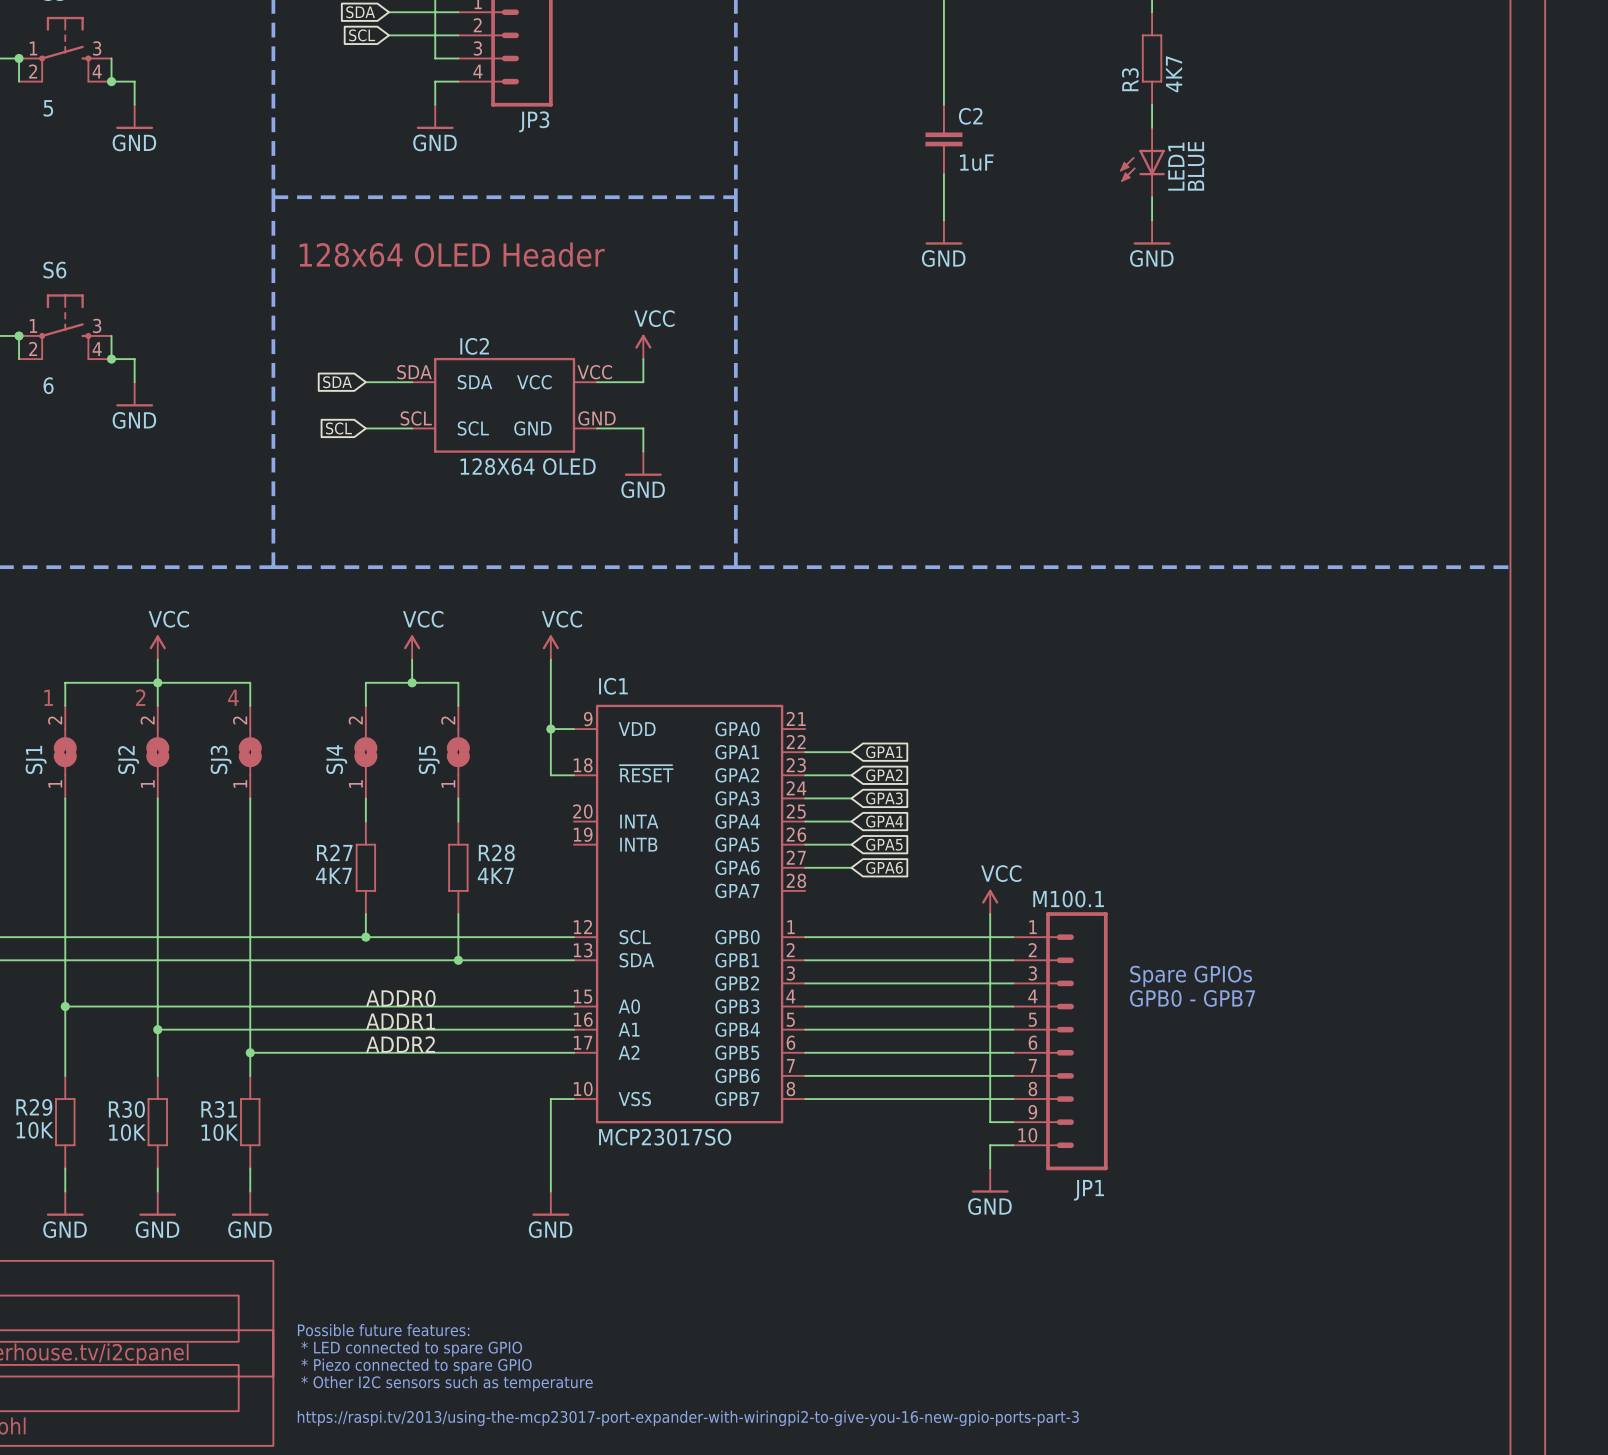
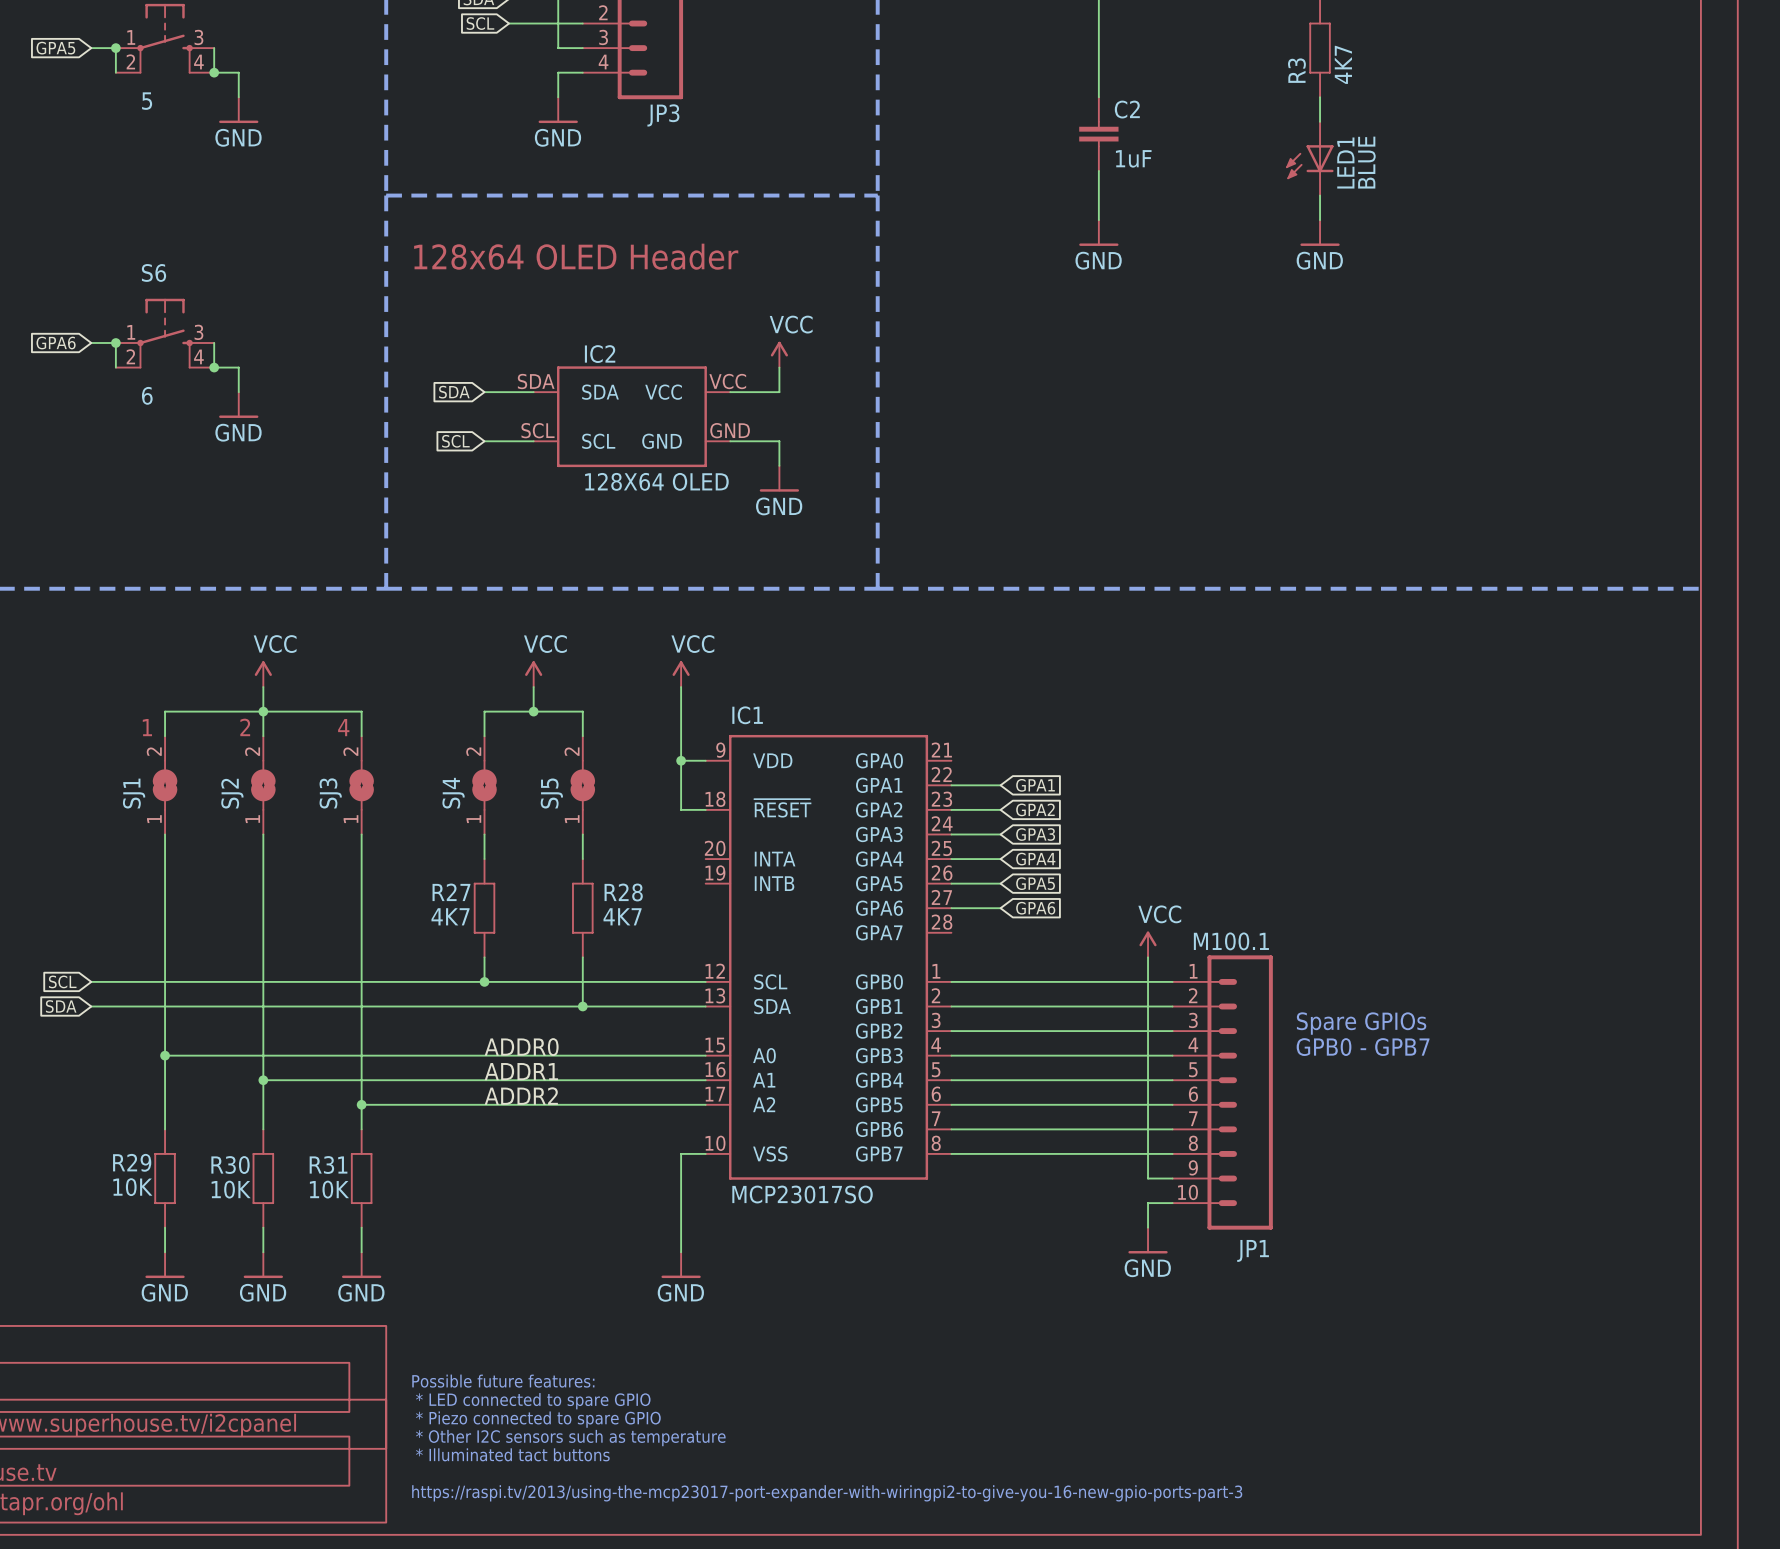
text: none -> Possible future features: (503, 1381)
text: Possible future features: (383, 1330) -> * LED connected to spare GPIO (533, 1401)
text: * LED connected to spare GPIO (411, 1349) -> * Piezo connected to spare GPIO (538, 1419)
text: * Piezo connected to spare GPIO (416, 1366) -> * Other I2C sensors such as temperature (570, 1438)
text: * Other I2C sensors such as temperature (447, 1383) -> * Illuminated tact buttons (512, 1454)

